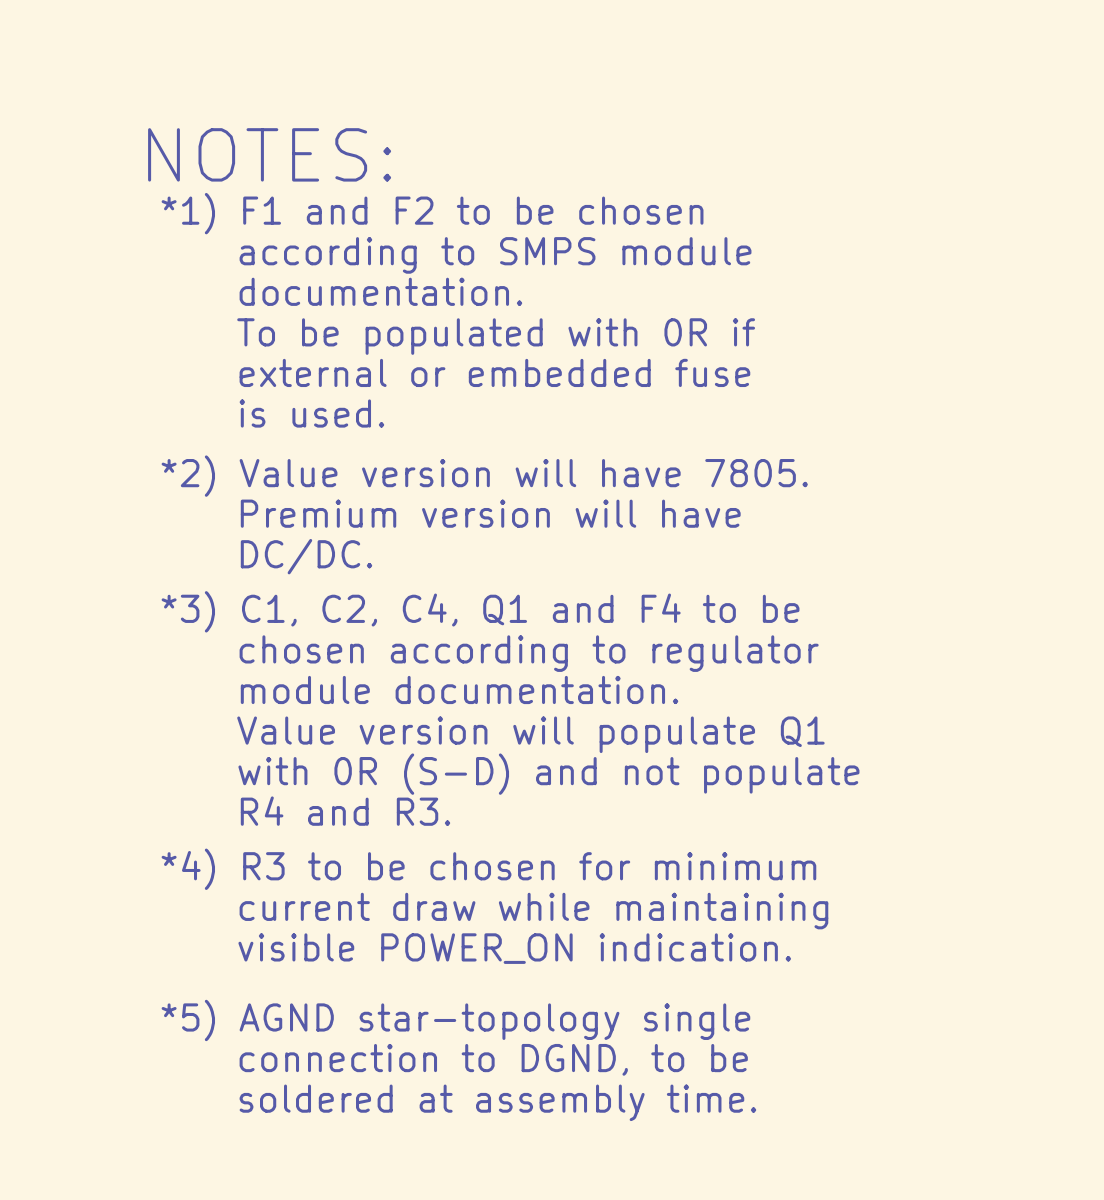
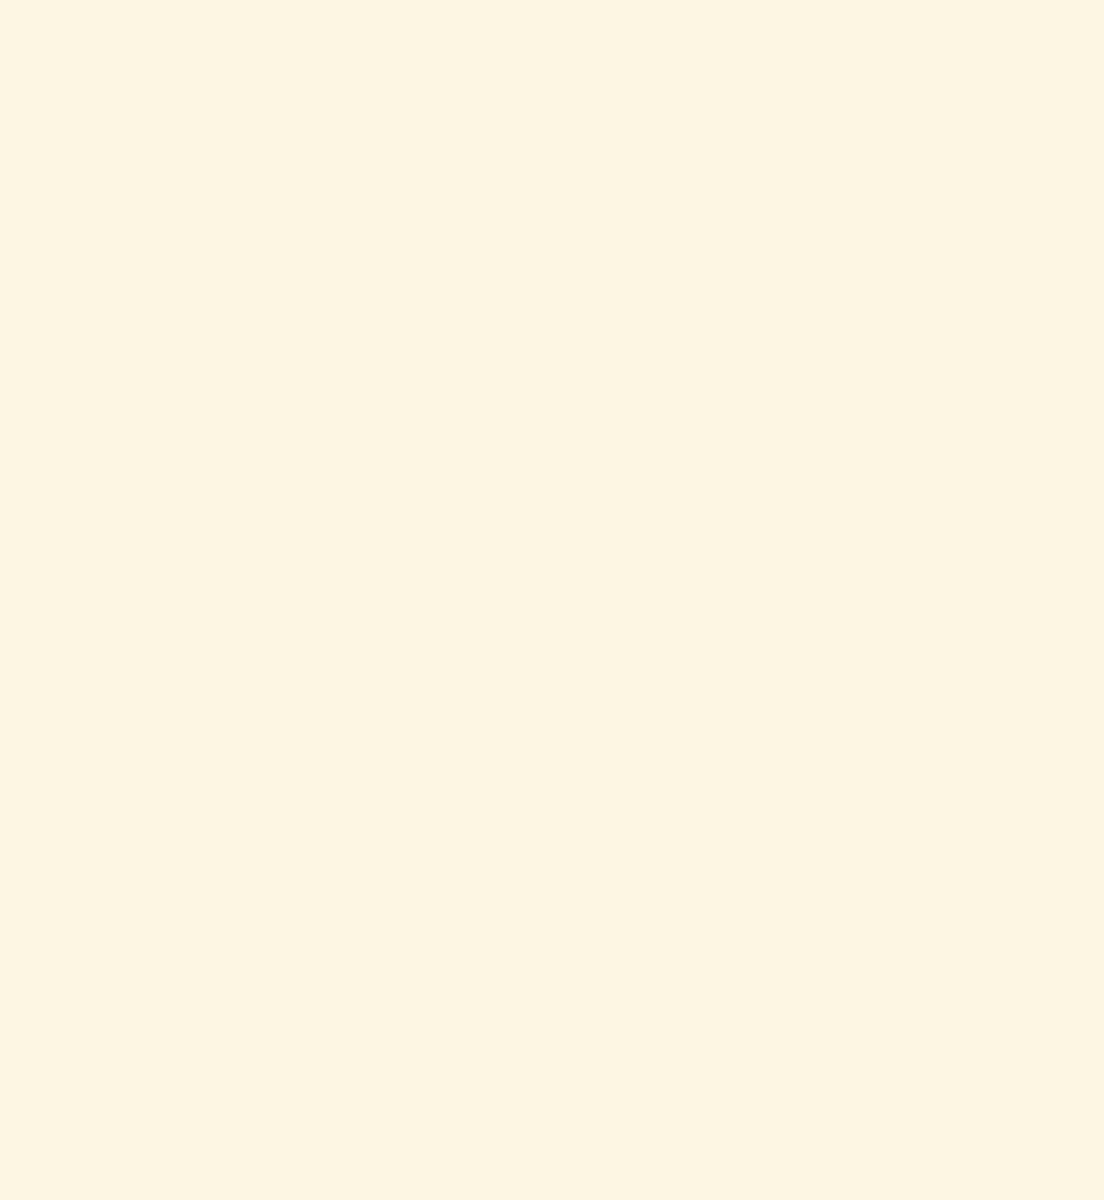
text: NOTES: (269, 154) -> none
text: *1) F1 and F2 to be chosen (432, 213) -> none
text: according to SMPS module (495, 255) -> none
text: documentation. (380, 291) -> none
text: To be populated with 0R if (496, 336) -> none
text: external or embedded fuse (494, 372) -> none
text: is used. (311, 413) -> none
text: *2) Value version will have 7805. (484, 476) -> none
text: Premium version will have (490, 513) -> none
text: DC/DC. (306, 556) -> none
text: *3) C1, C2, C4, Q1 and F4 to be (480, 611) -> none
text: chosen according to regulator (529, 653) -> none
text: module documentation. (459, 689) -> none
text: Value version will populate Q1 (530, 734) -> none
text: with 0R (S-D) and not populate (548, 774) -> none
text: R4 and R3. (345, 811) -> none
text: *4) R3 to be chosen for minimum (488, 869) -> none
text: current draw while maintaining (533, 911) -> none
text: visible POWER_ON indication. (514, 948) -> none
text: *5) AGND star-topology single (455, 1020) -> none
text: connection to DGND, to be (493, 1059) -> none
text: soldered at assembly time. (497, 1102) -> none

